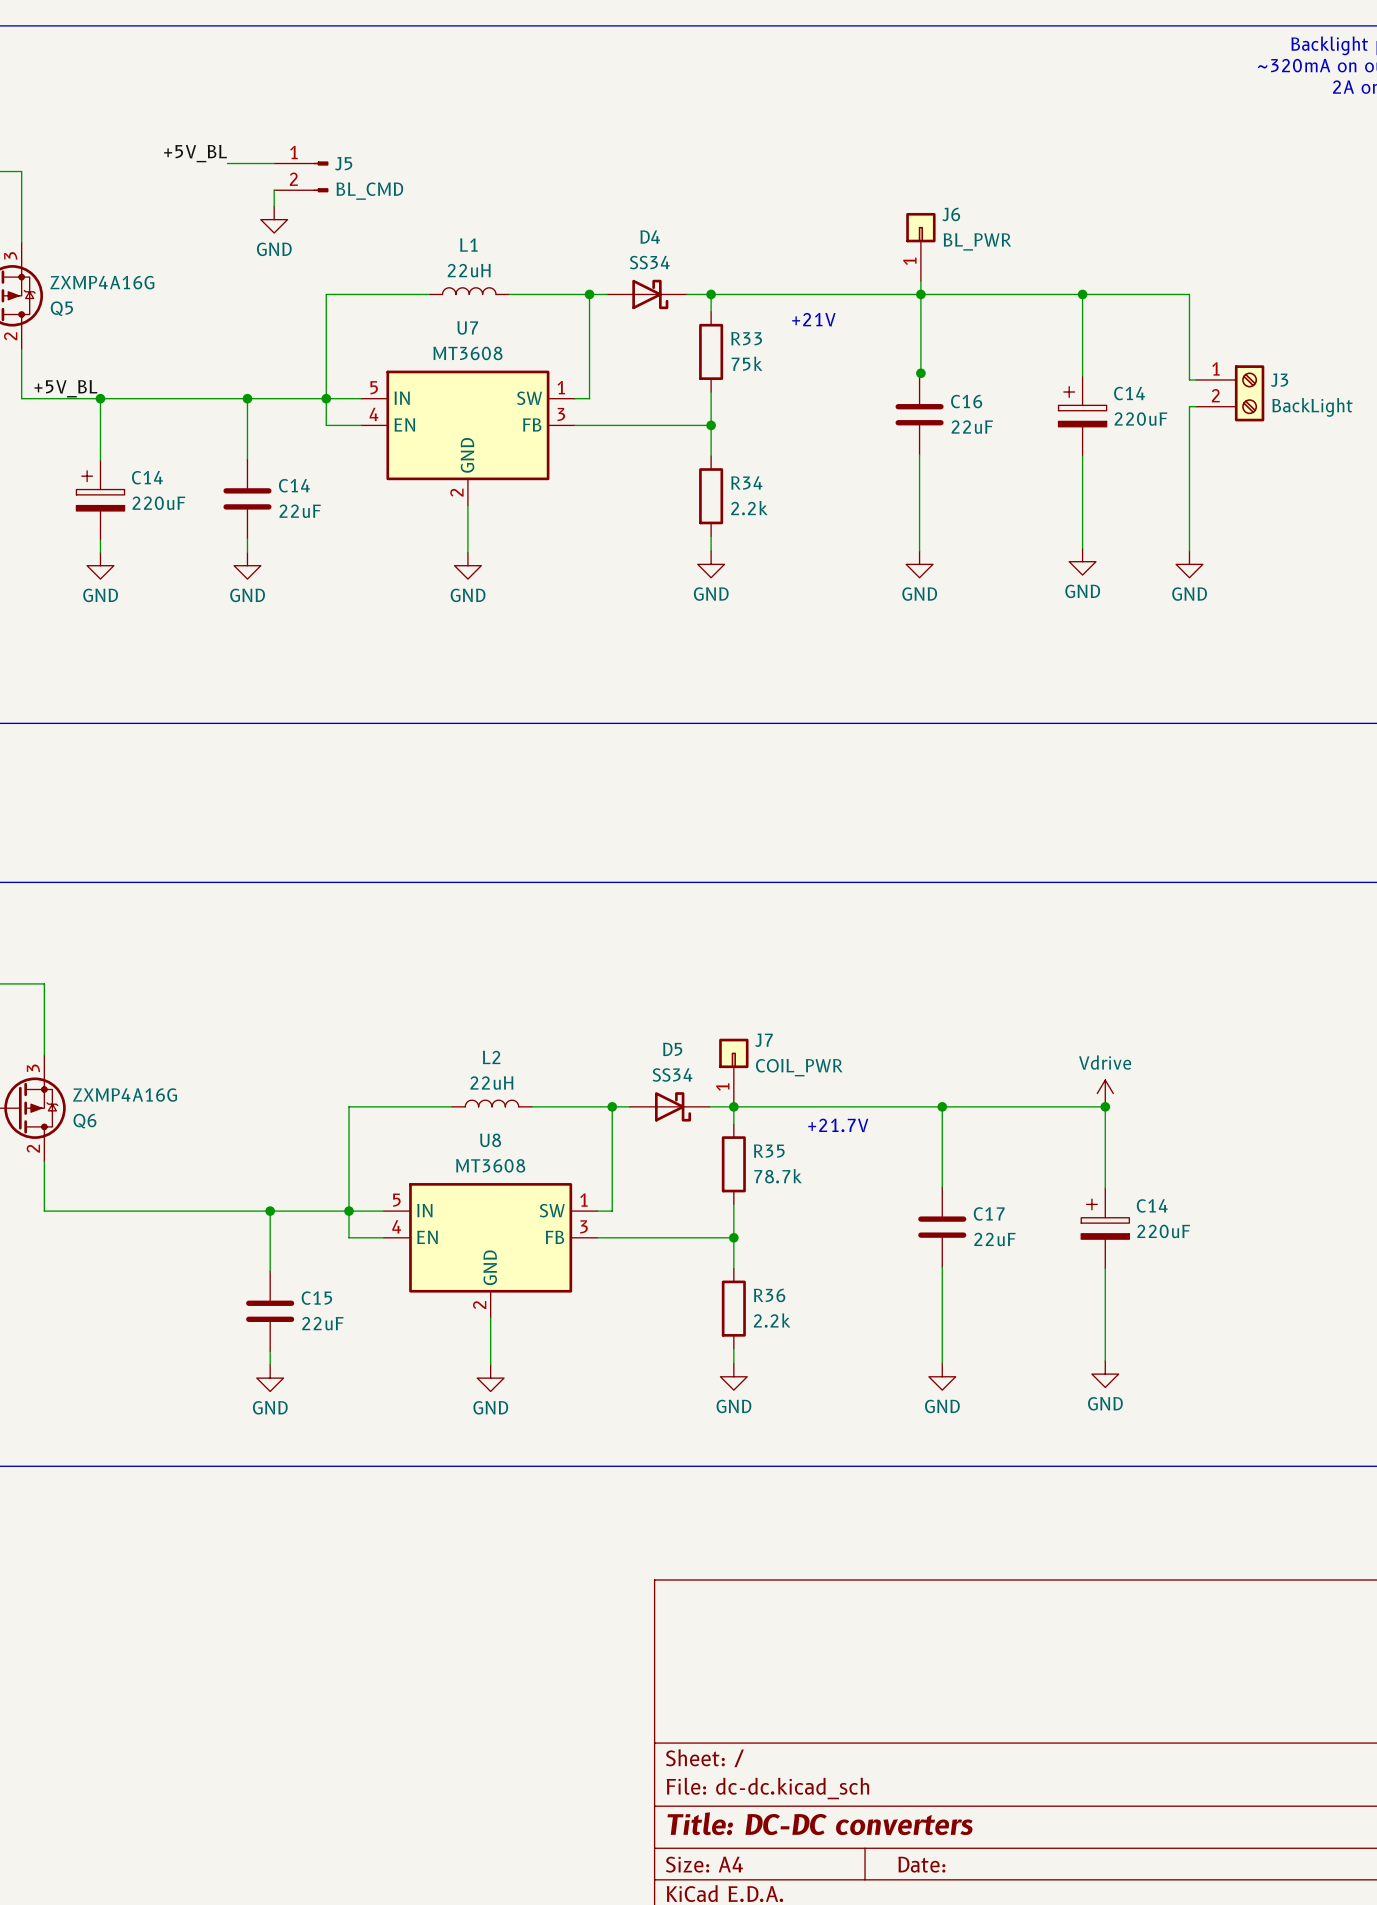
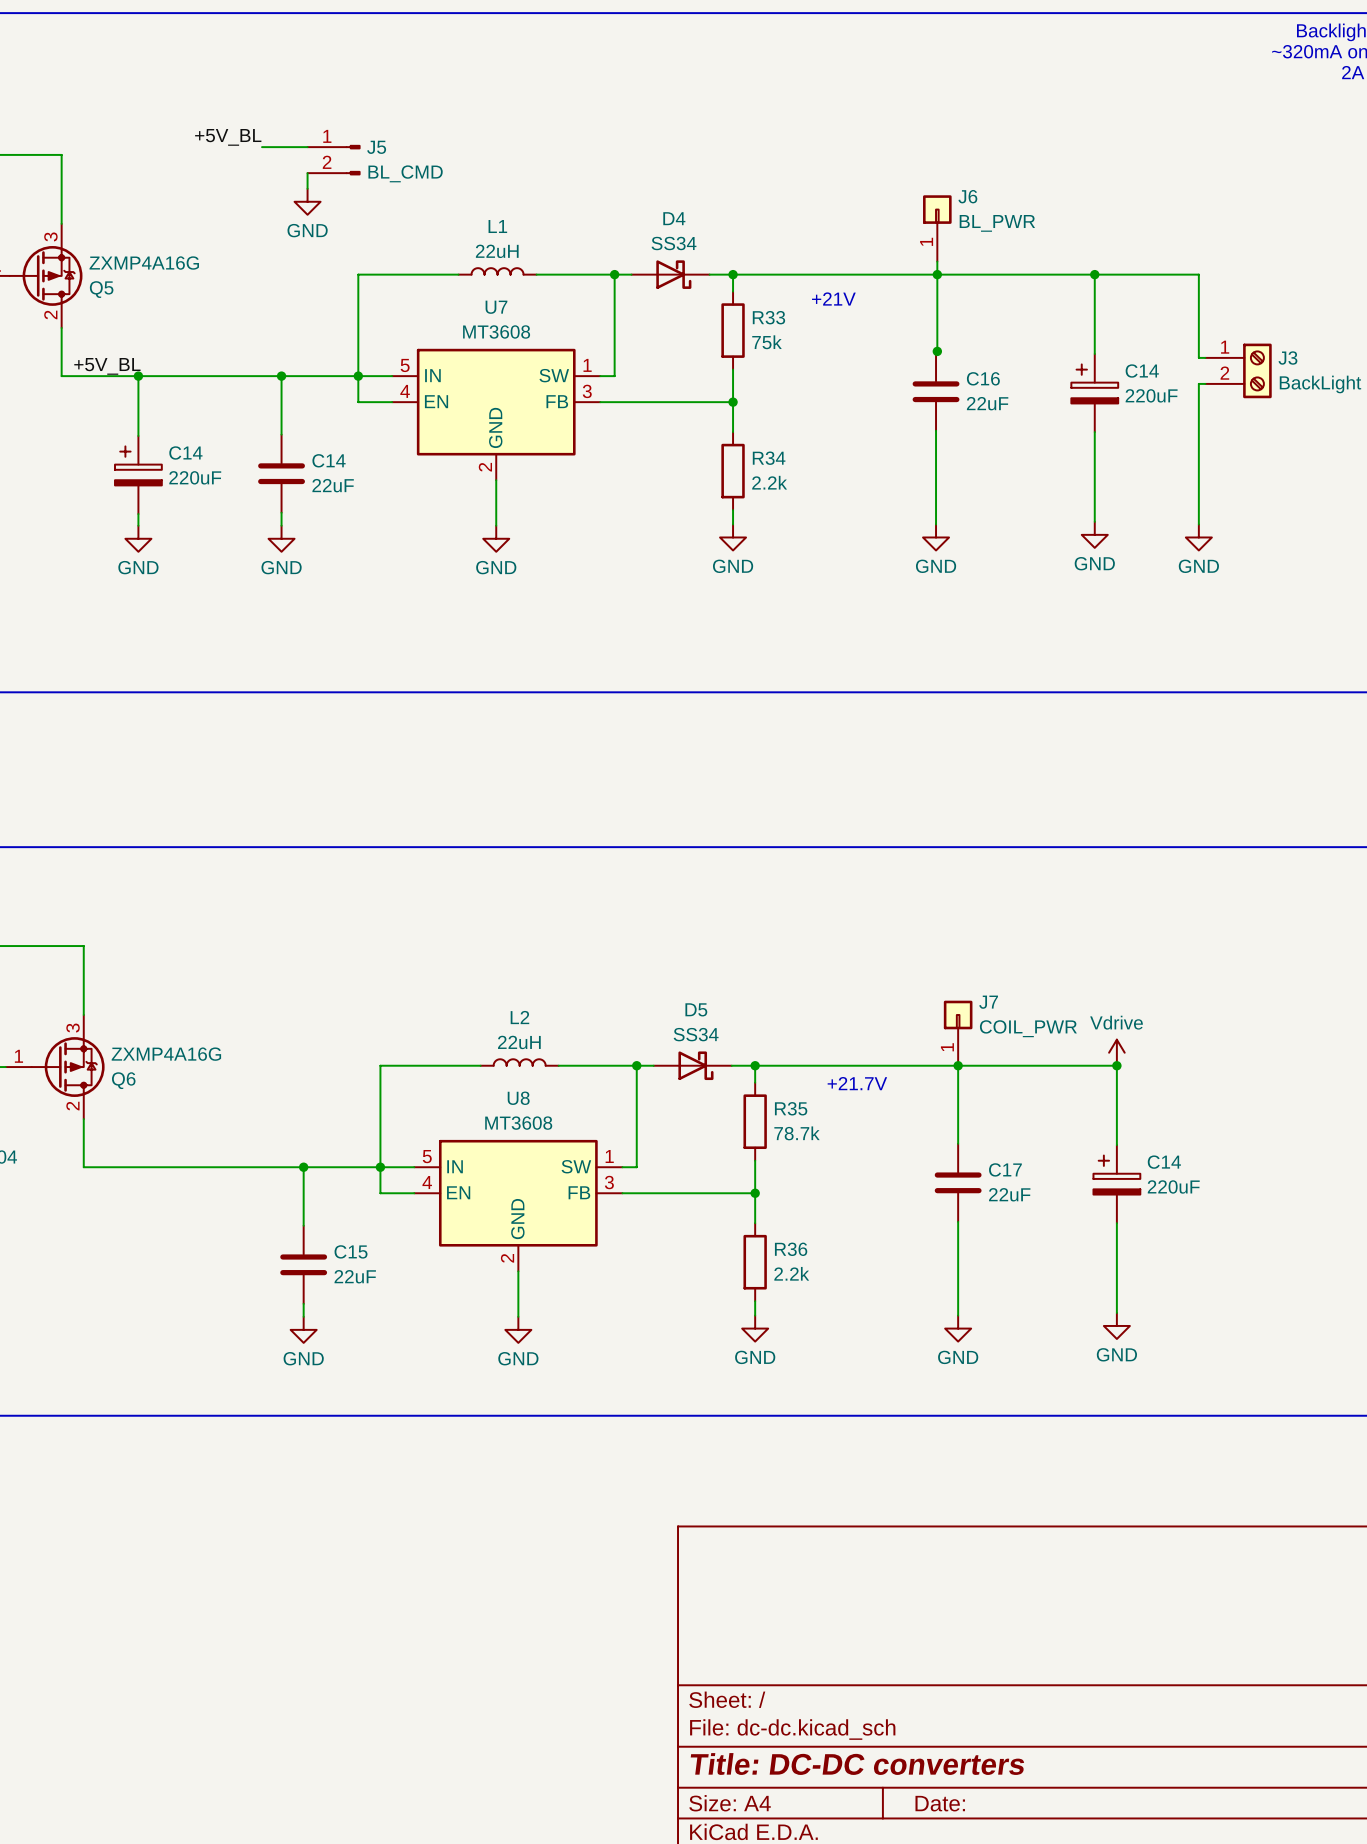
J7 position: (733, 1072) -> (958, 1033)

